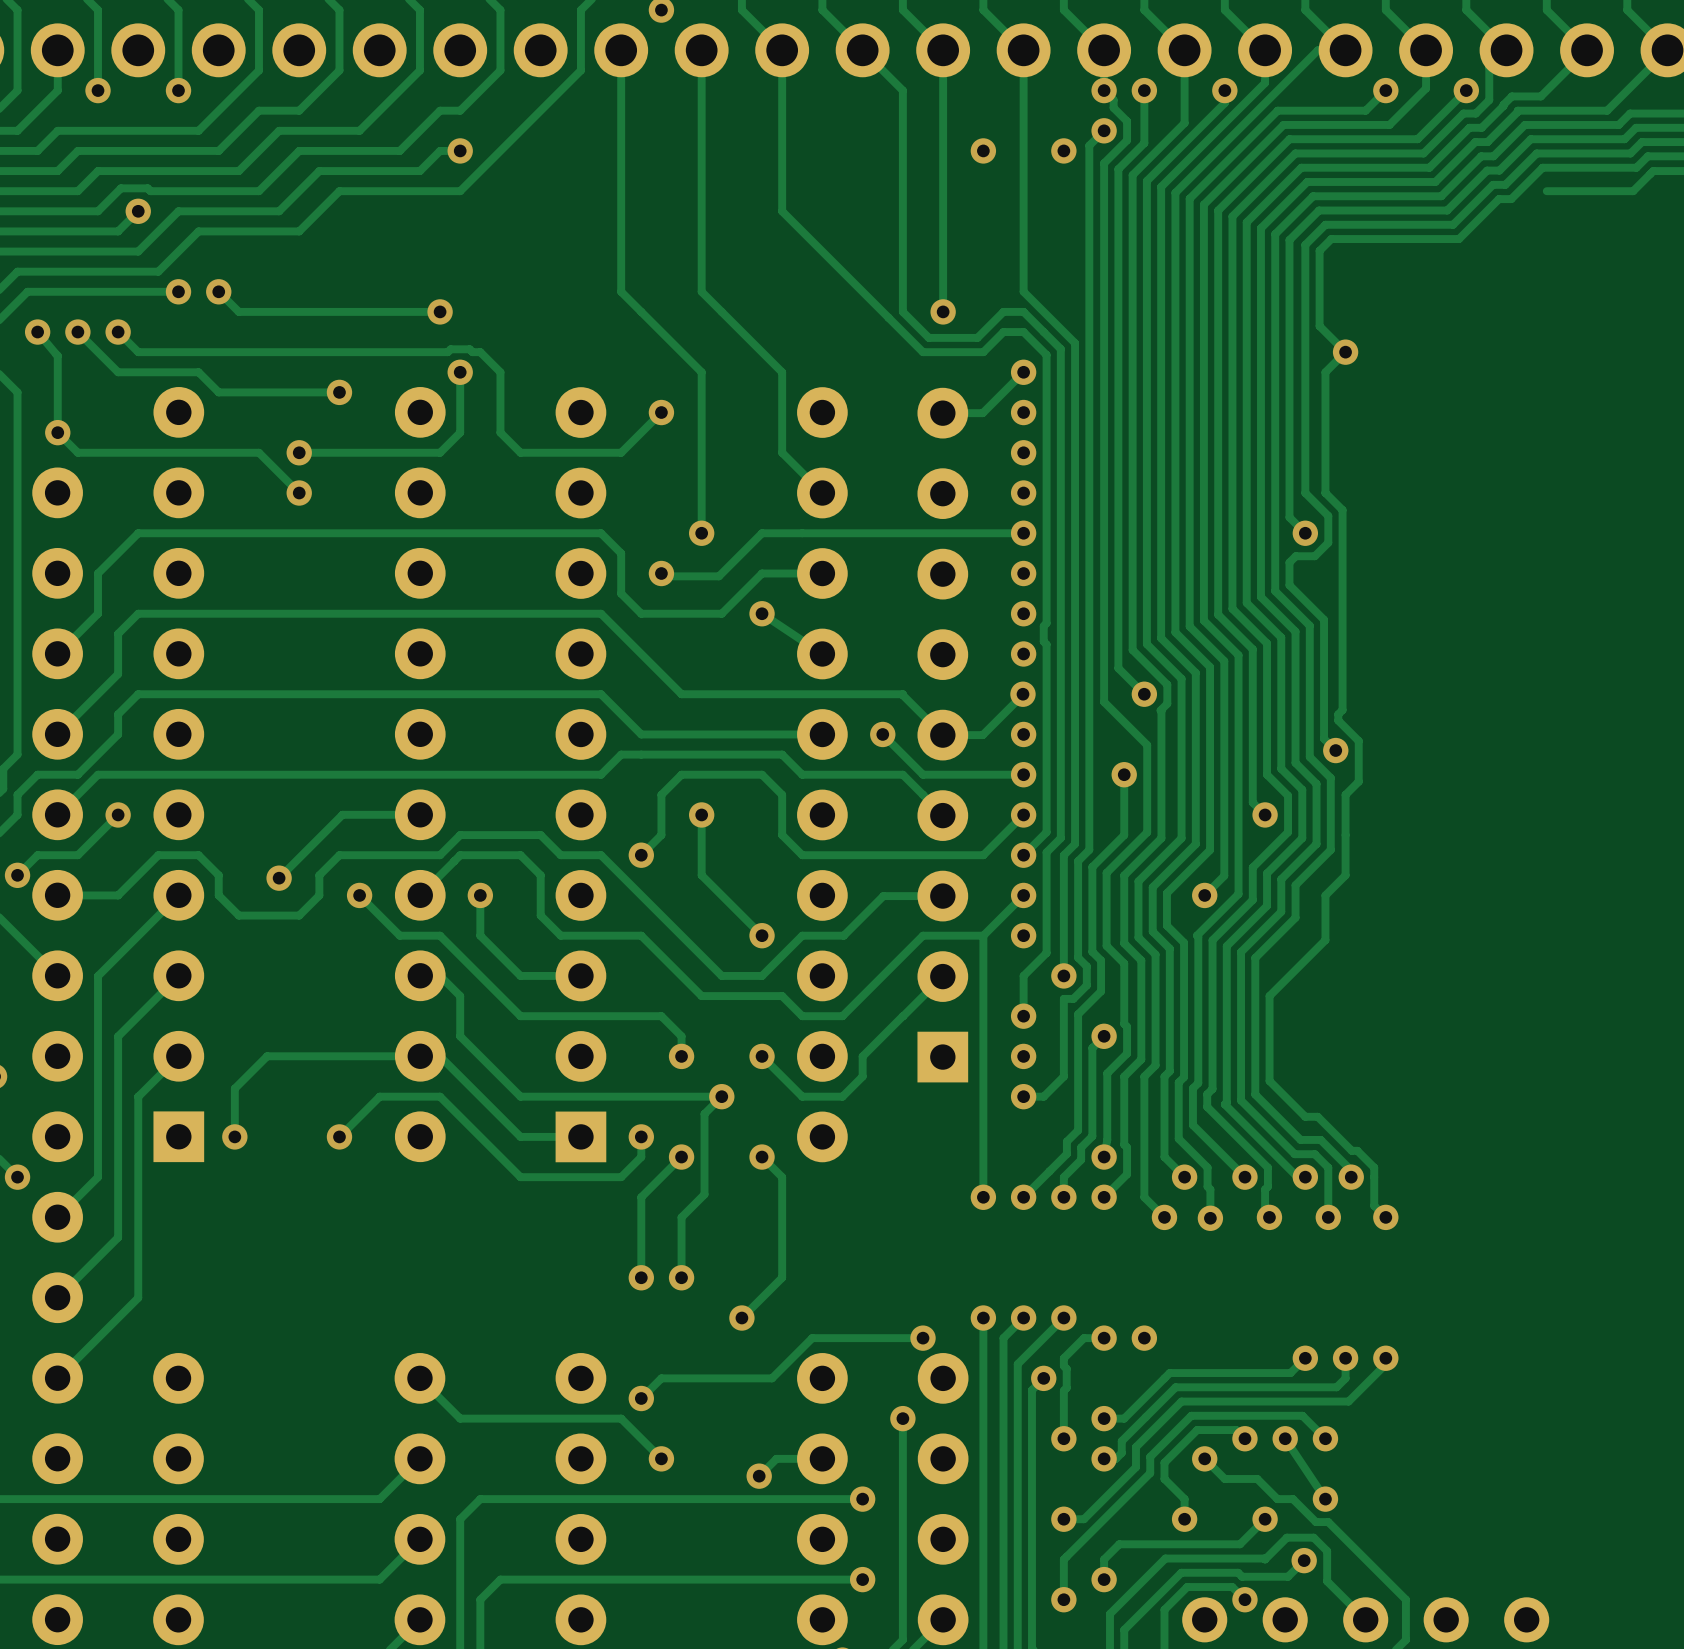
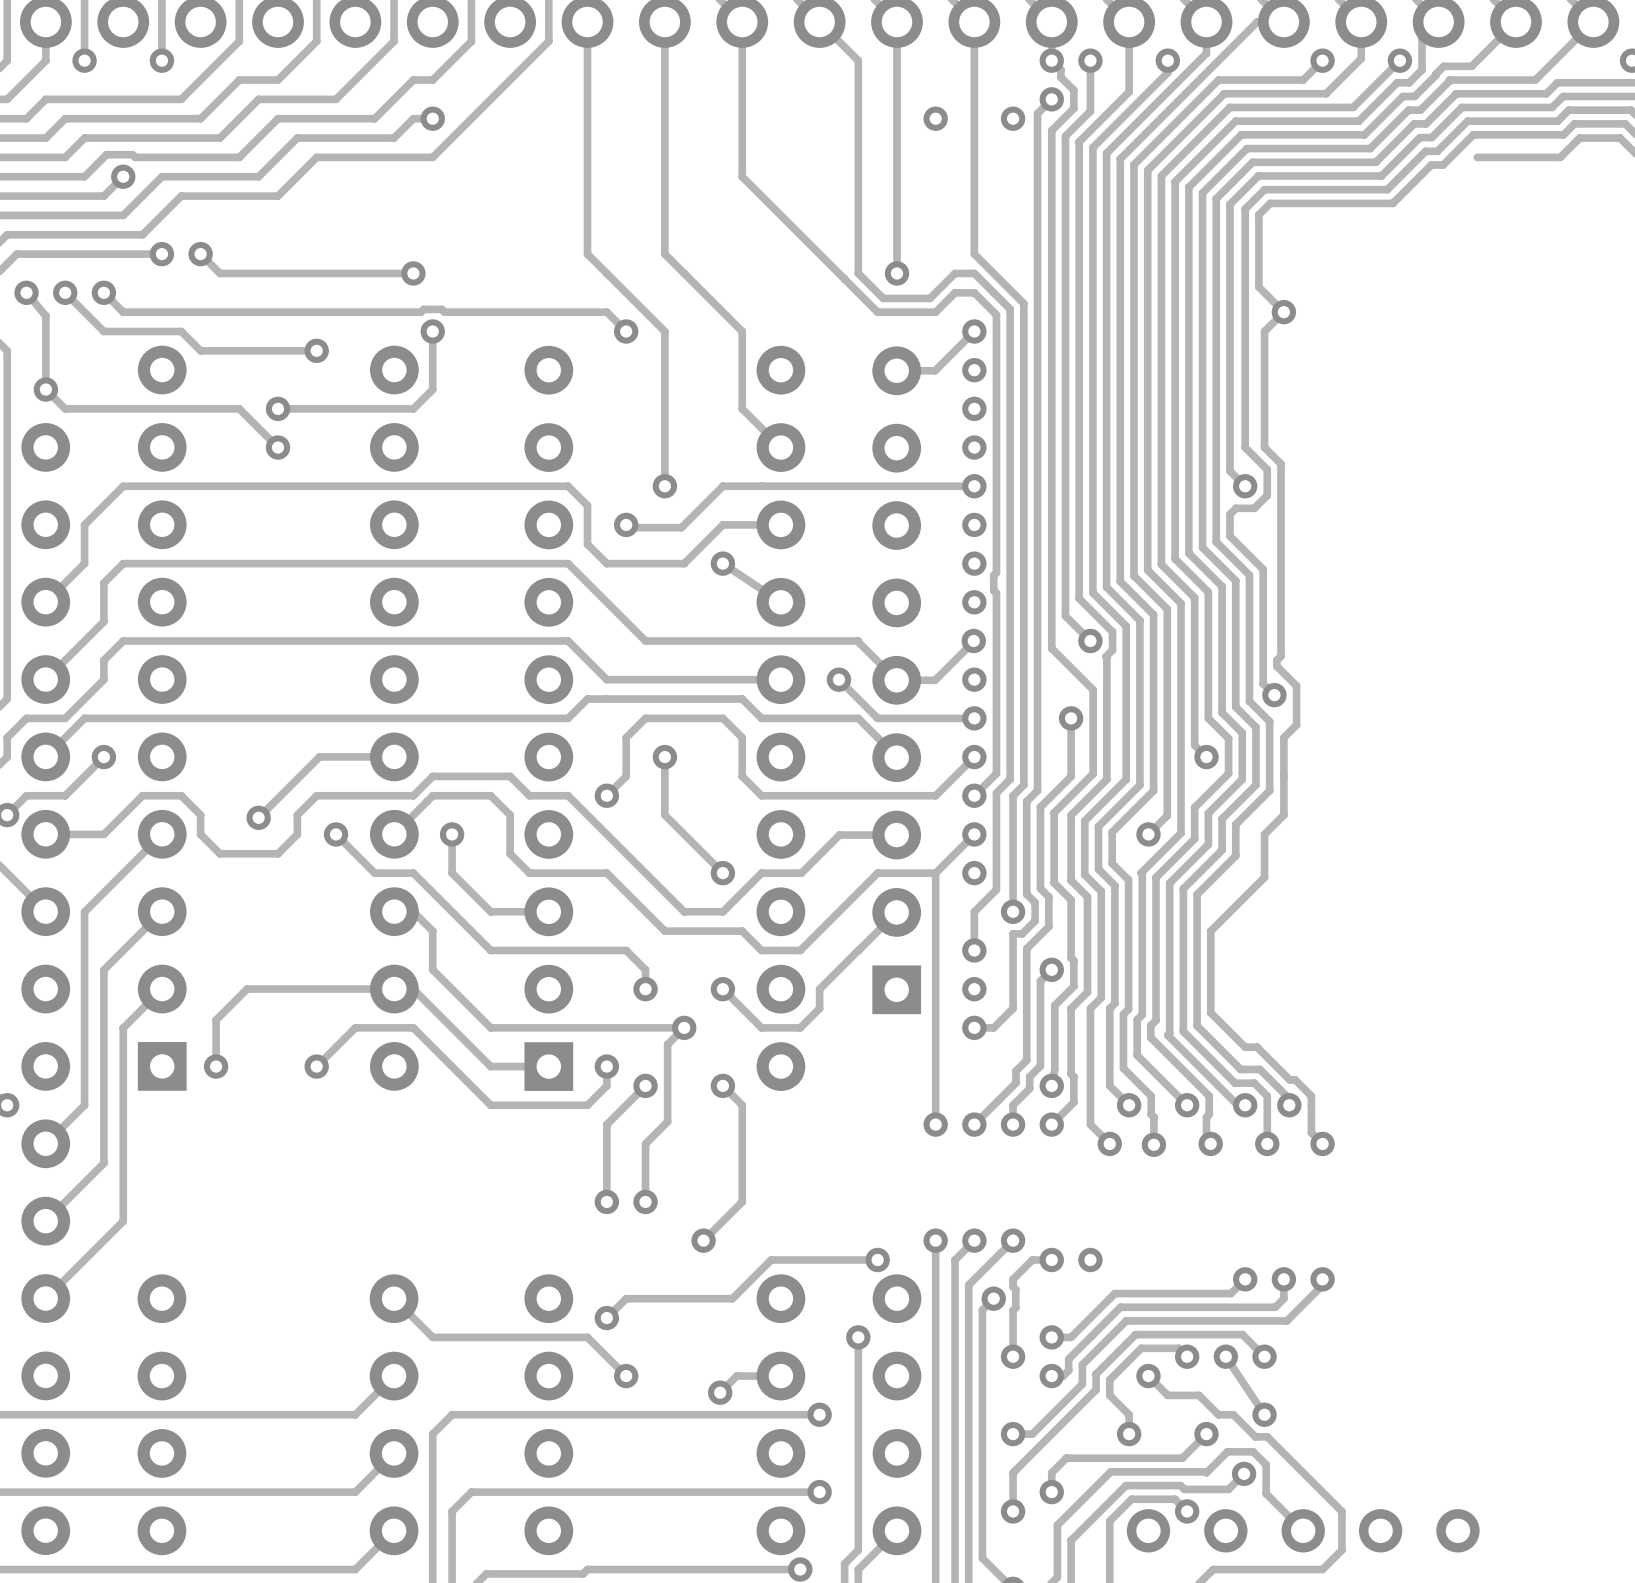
track: (480, 352) (500, 372) (500, 432) (520, 452) (621, 452) (661, 412) -> (452, 312) (606, 312) (626, 331)
via position: (661, 412) -> (626, 331)

